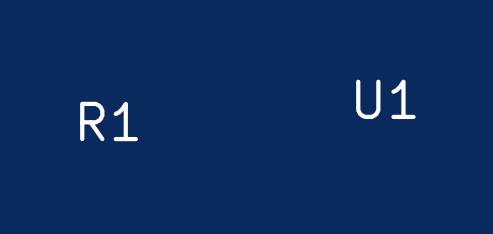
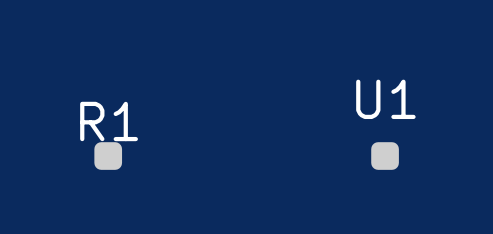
U1 footprint: [356, 79, 416, 120] -> [371, 142, 399, 170]
R1 footprint: [80, 101, 138, 142] -> [94, 142, 123, 170]

